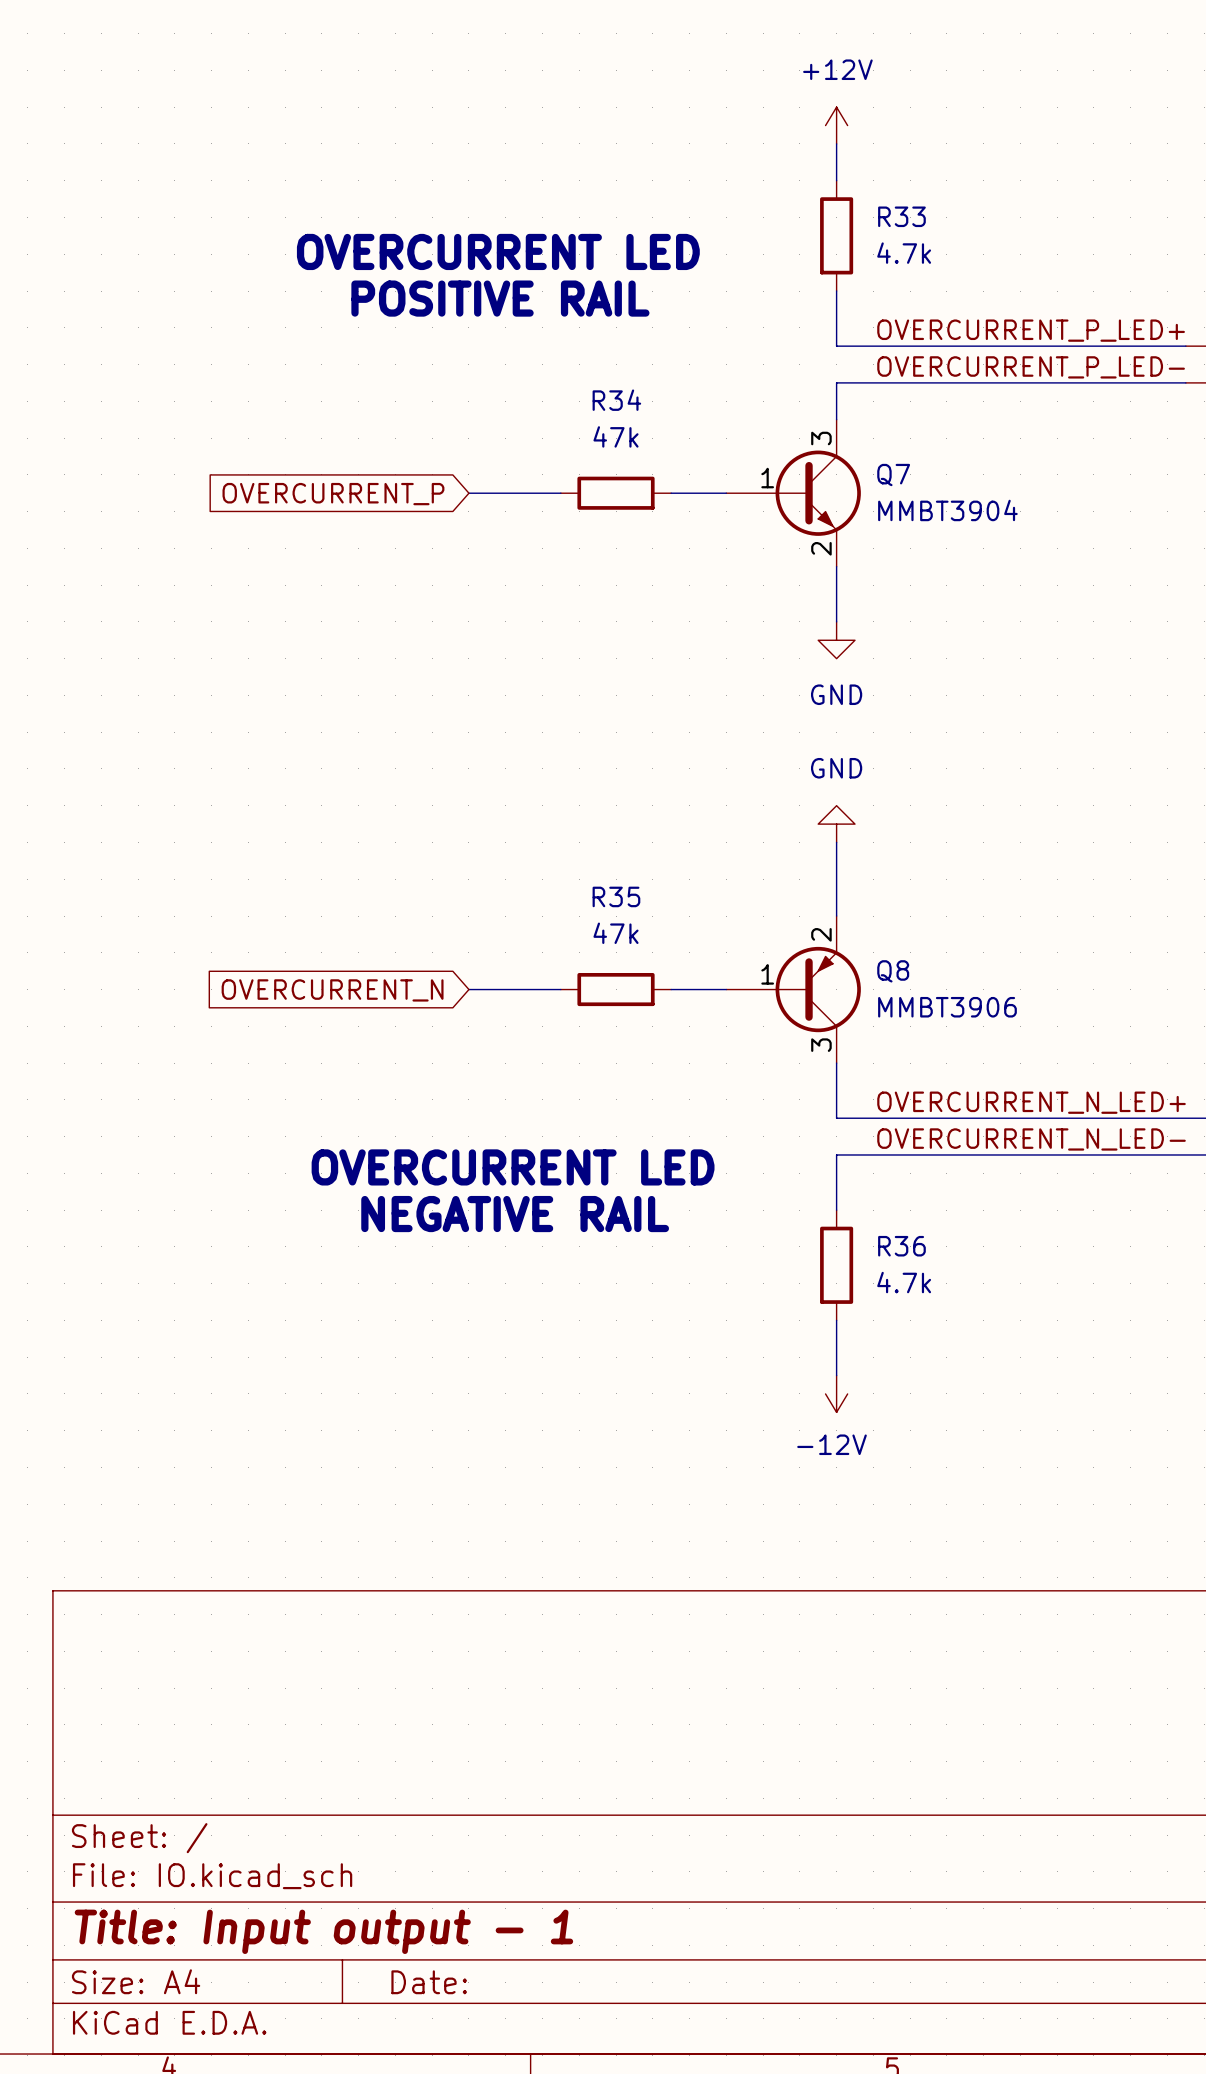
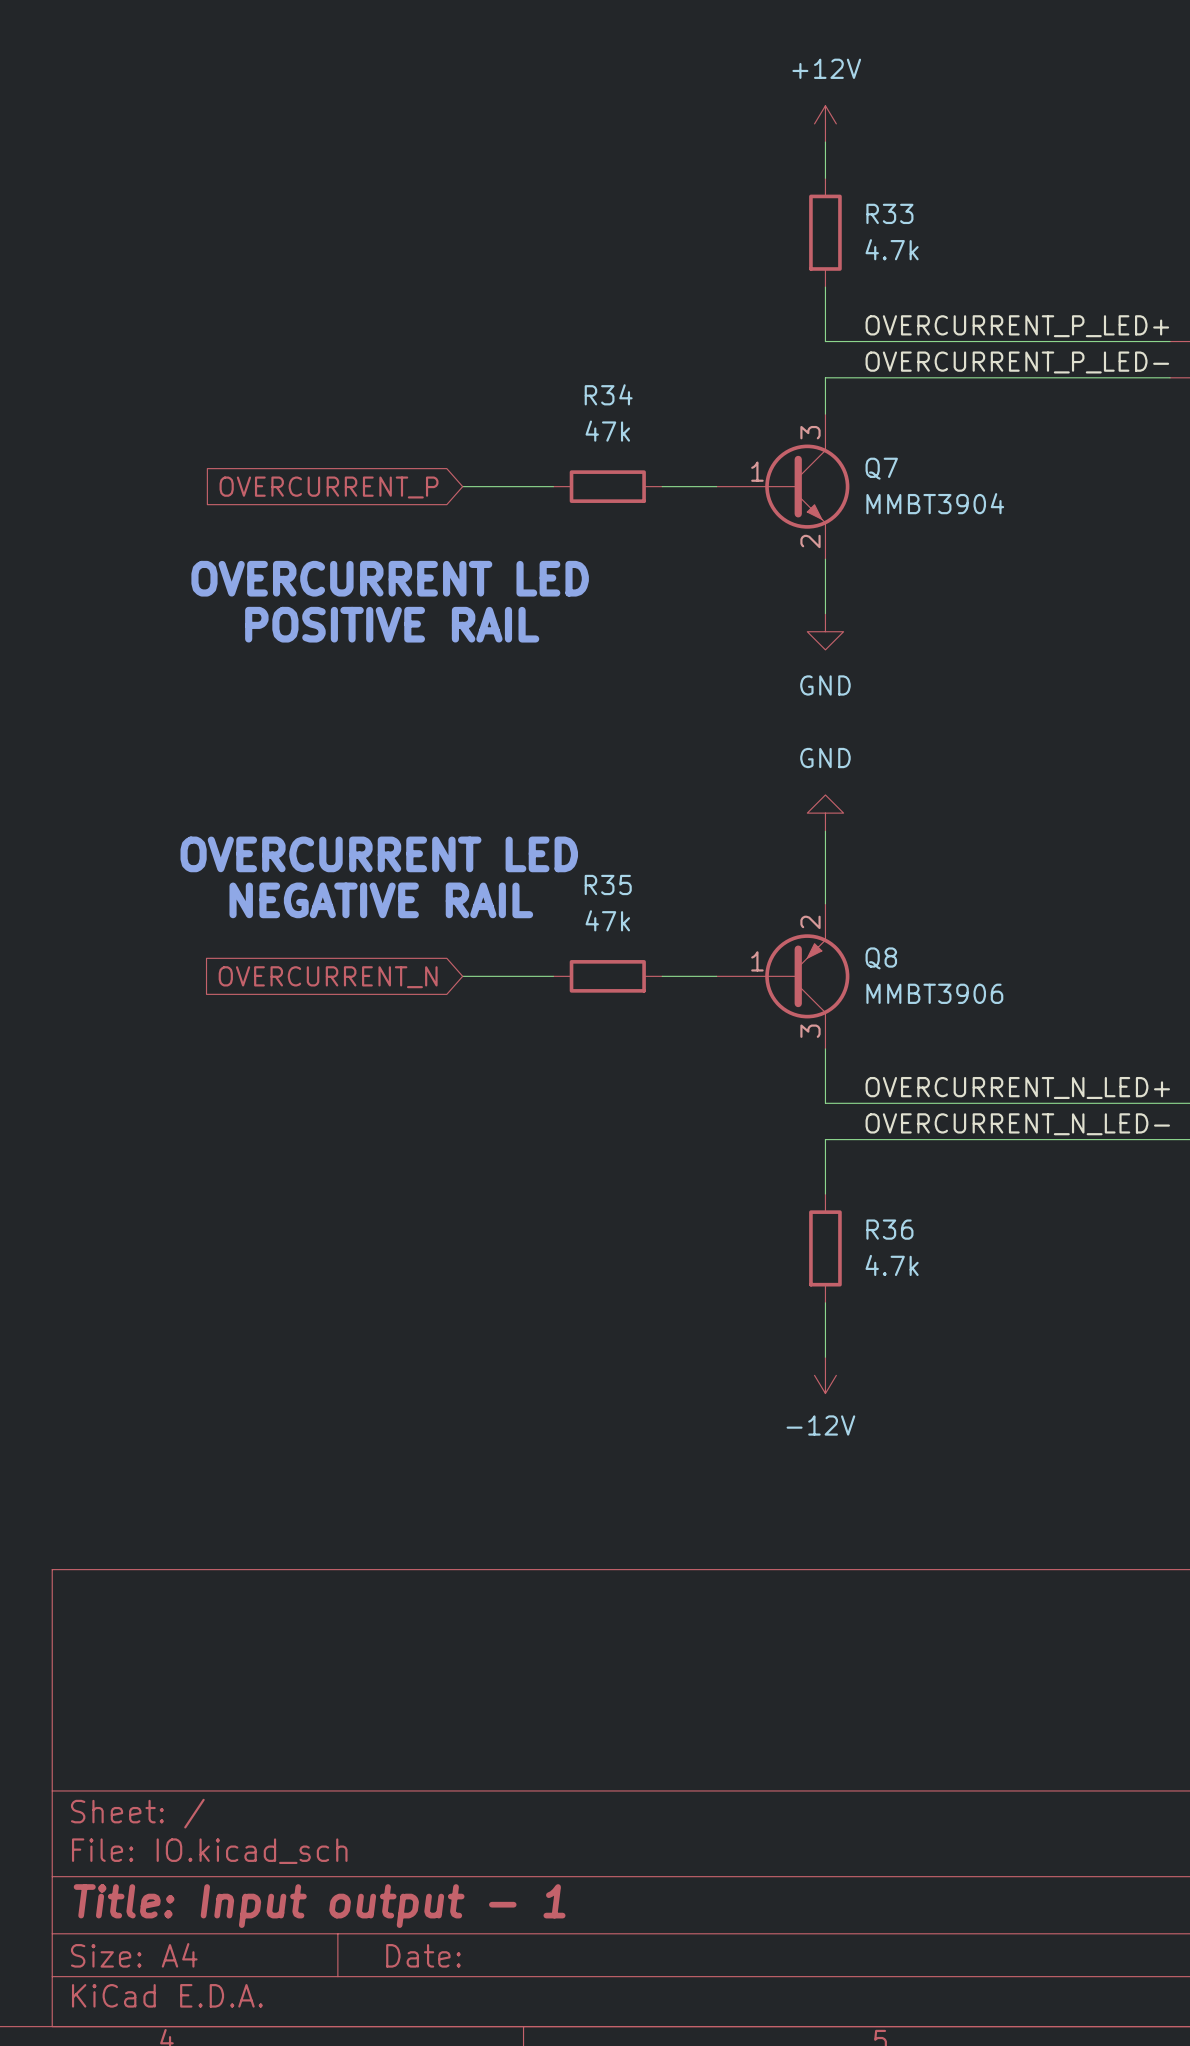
text: OVERCURRENT LED (498, 251) -> none
text position: POSITIVE RAIL (500, 298) -> POSITIVE RAIL (392, 624)
text: none -> OVERCURRENT LED (390, 578)
text: none -> OVERCURRENT LED (379, 854)
text: OVERCURRENT LED (513, 1167) -> none
text position: NEGATIVE RAIL (515, 1214) -> NEGATIVE RAIL (381, 900)

